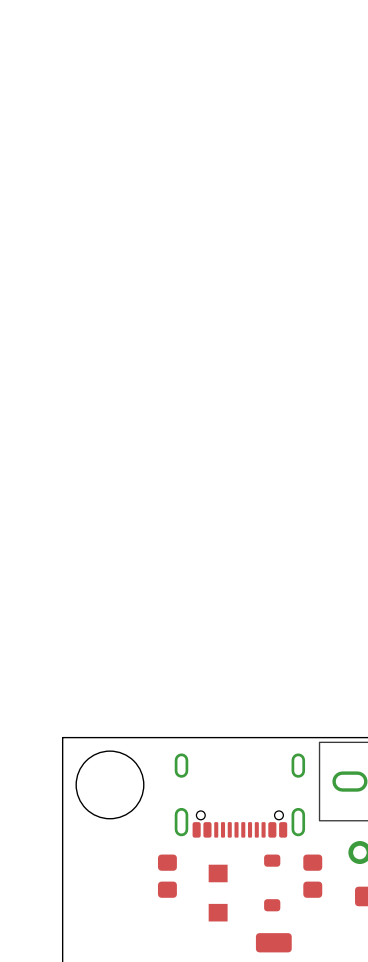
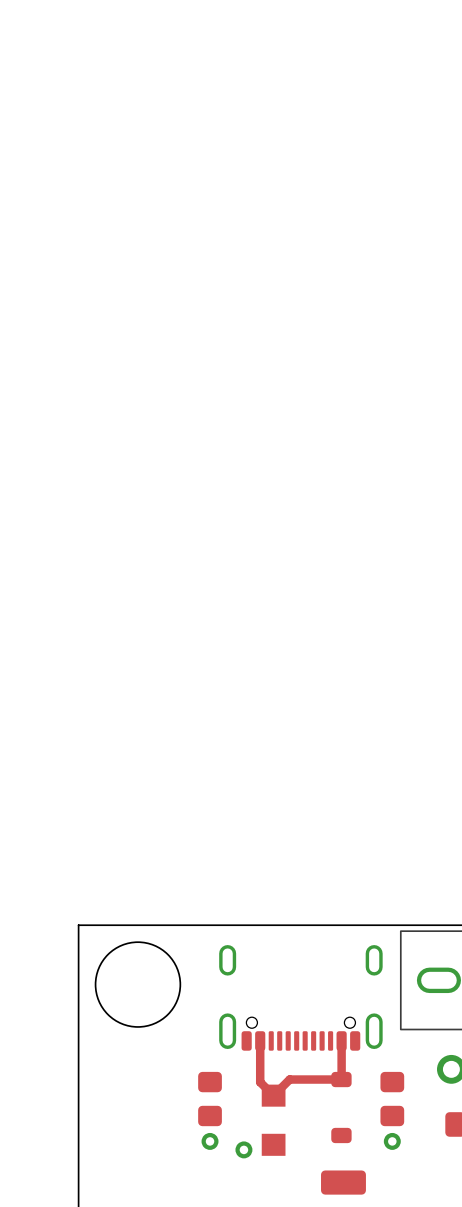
top track: none -> (260, 1040) (260, 1082) (273, 1095) (289, 1079) (341, 1079)
top track: none -> (341, 1040) (341, 1079)
via: none -> (210, 1141)
via: none -> (392, 1141)
via: none -> (243, 1149)

